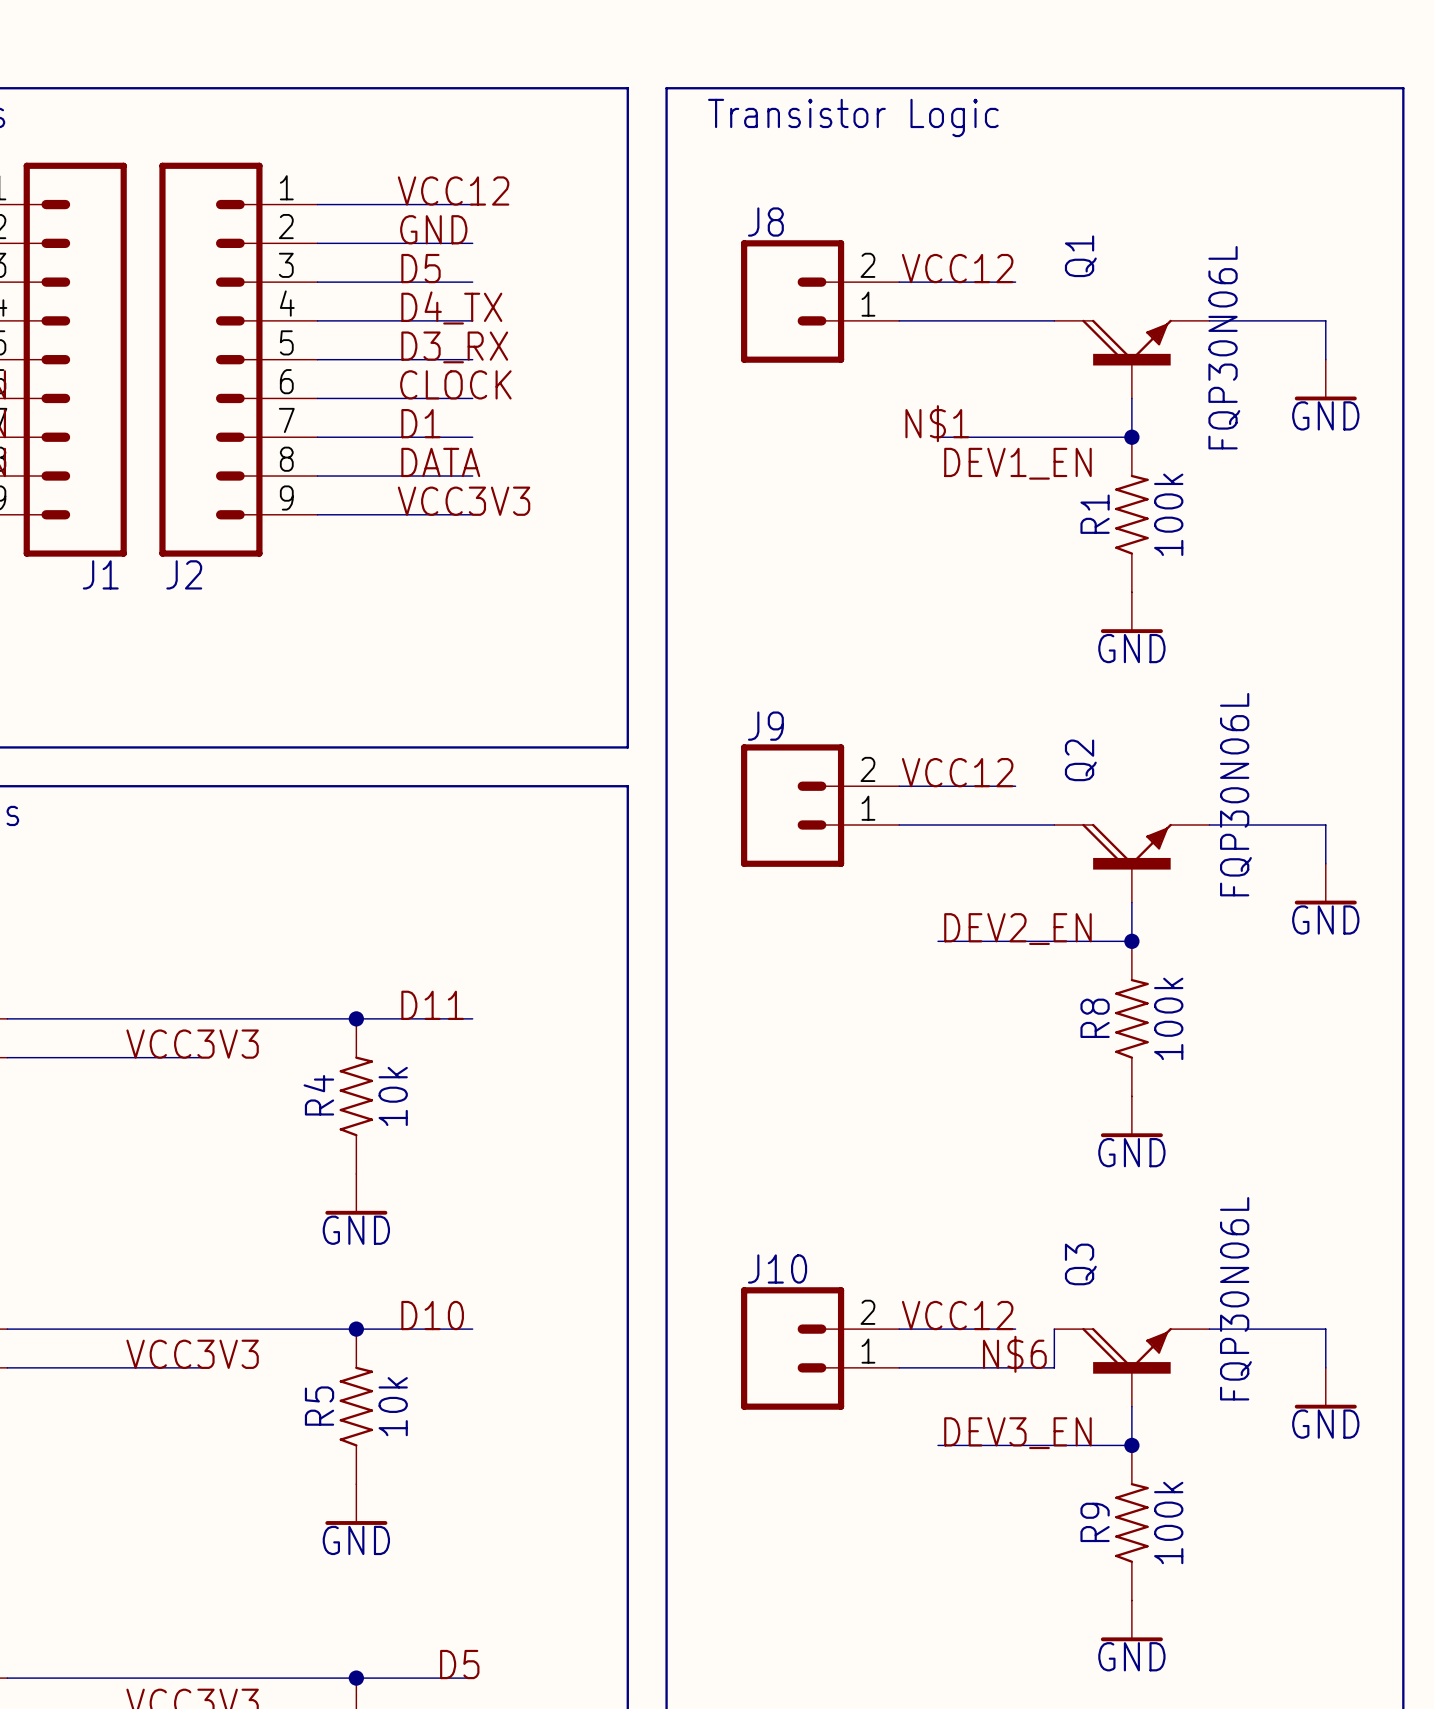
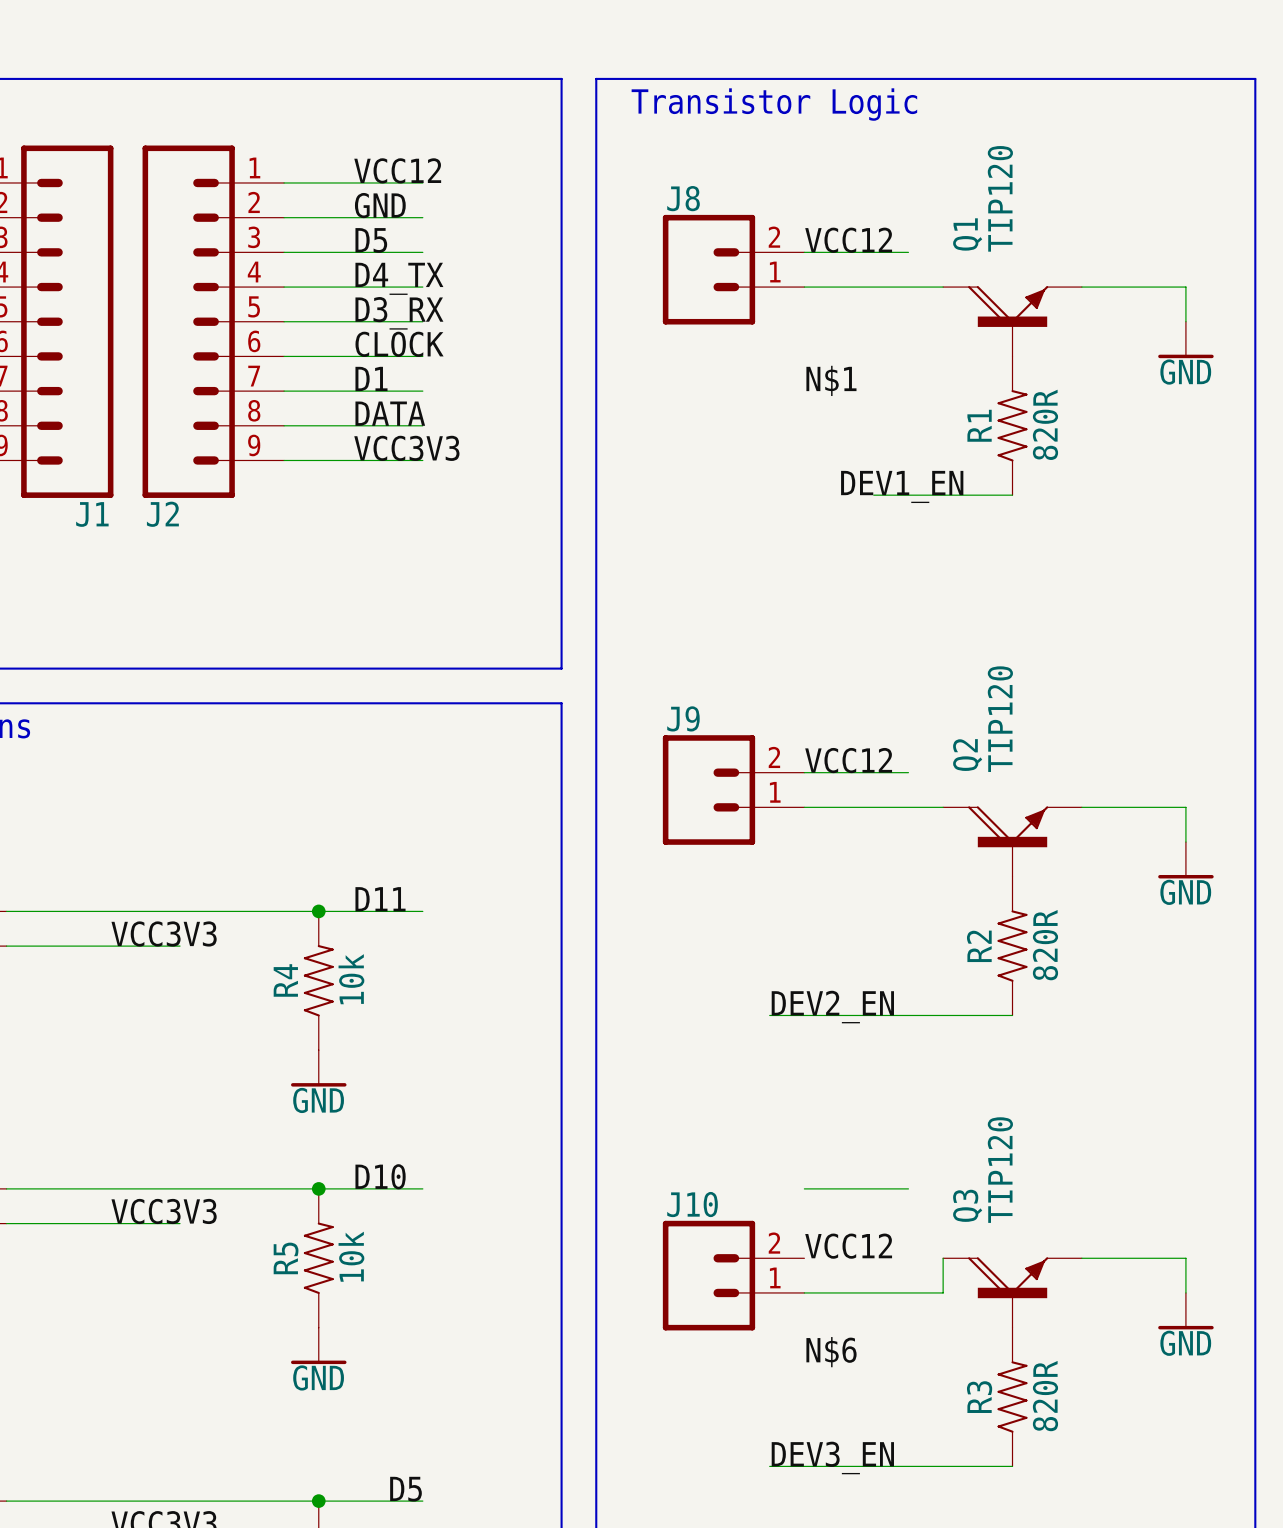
Q1 value: FQP30N06L (1224, 347) -> TIP120 (1000, 198)
wire: (1131, 398) (1131, 437) (938, 437) -> none
junction: (1131, 437) -> none
label position: DEV1_EN (1017, 463) -> DEV1_EN (902, 486)
R1 position: (1131, 514) -> (1012, 425)
R1 value: 100k (1168, 514) -> 820R (1045, 424)
wire: none -> (873, 495) (1012, 495)
power symbol: GND (1131, 612) -> none
label position: VCC12 (957, 772) -> VCC12 (848, 760)
wire: (899, 786) (1015, 786) -> (804, 772) (908, 772)
Q2 value: FQP30N06L (1235, 794) -> TIP120 (1000, 719)
J9 position: (820, 805) -> (733, 790)
wire: (899, 825) (1054, 825) -> (804, 807) (943, 807)
wire: (1209, 825) (1325, 825) (1325, 863) -> (1081, 807) (1185, 807) (1185, 842)
Q2 position: (1131, 863) -> (1012, 841)
power symbol position: GND (1325, 884) -> GND (1185, 860)
wire: (1131, 902) (1131, 941) (938, 941) -> none
label position: DEV2_EN (1017, 929) -> DEV2_EN (832, 1007)
junction: (1131, 941) -> none
R8: 100k (1131, 1018) -> none
R2: none -> 820R (1012, 946)
power symbol: GND (1131, 1116) -> none
wire: none -> (769, 1015) (1012, 1015)
Q3 value: FQP30N06L (1235, 1298) -> TIP120 (1000, 1170)
label position: VCC12 (957, 1315) -> VCC12 (848, 1246)
wire: (1054, 1329) (1054, 1367) (899, 1367) -> none
wire: (1209, 1329) (1325, 1329) (1325, 1367) -> (1081, 1258) (1185, 1258) (1185, 1292)
J10 position: (820, 1348) -> (733, 1275)
label position: N$6 (1014, 1354) -> N$6 (831, 1352)
Q3 position: (1131, 1367) -> (1012, 1292)
power symbol position: GND (1325, 1388) -> GND (1185, 1311)
wire: (1131, 1406) (1131, 1445) (1054, 1445) -> (943, 1258) (943, 1292)
label position: DEV3_EN (1017, 1433) -> DEV3_EN (832, 1457)
wire: none -> (804, 1292) (839, 1292)
junction: (1131, 1445) -> none
R9: 100k (1131, 1522) -> none
R3: none -> 820R (1012, 1397)
power symbol: GND (1131, 1620) -> none
wire: none -> (769, 1466) (1012, 1466)

